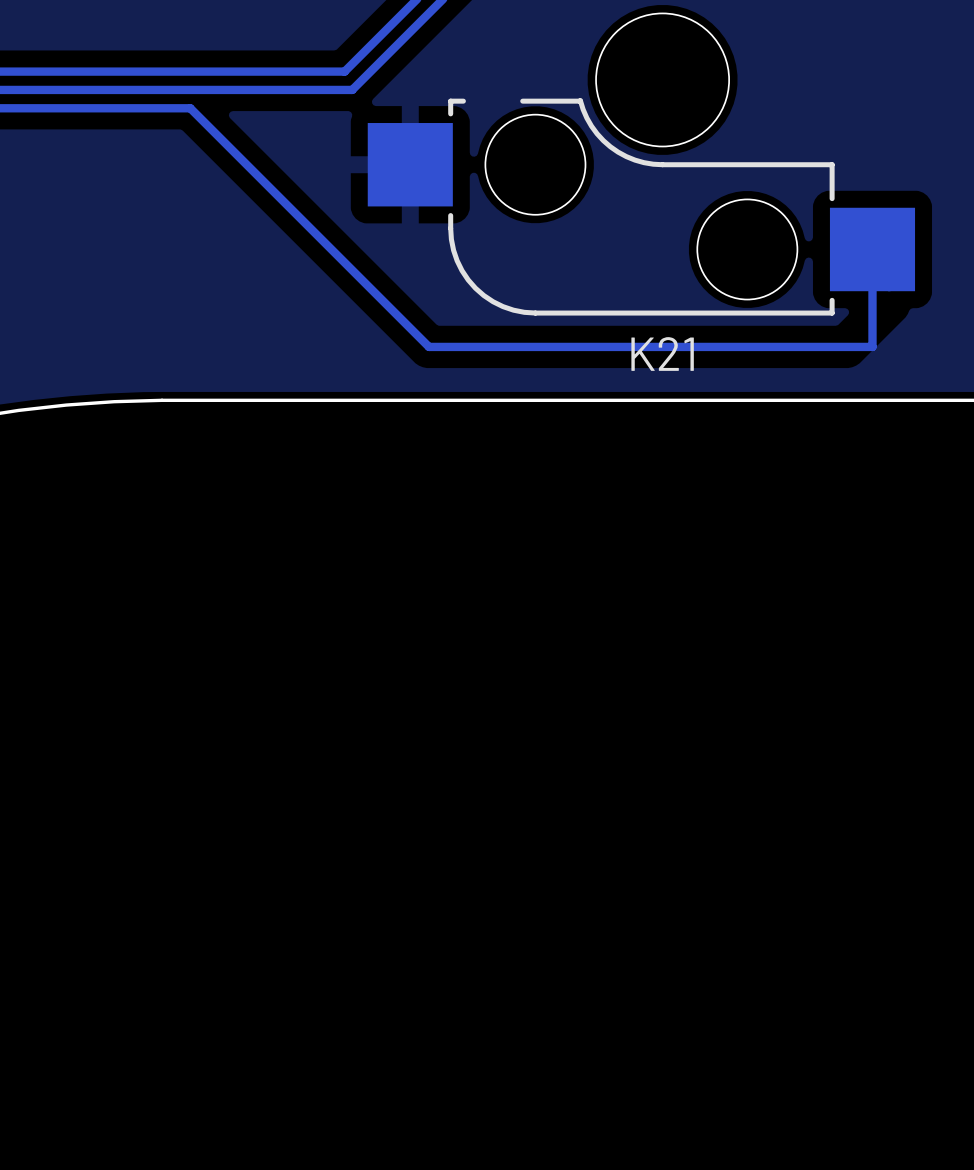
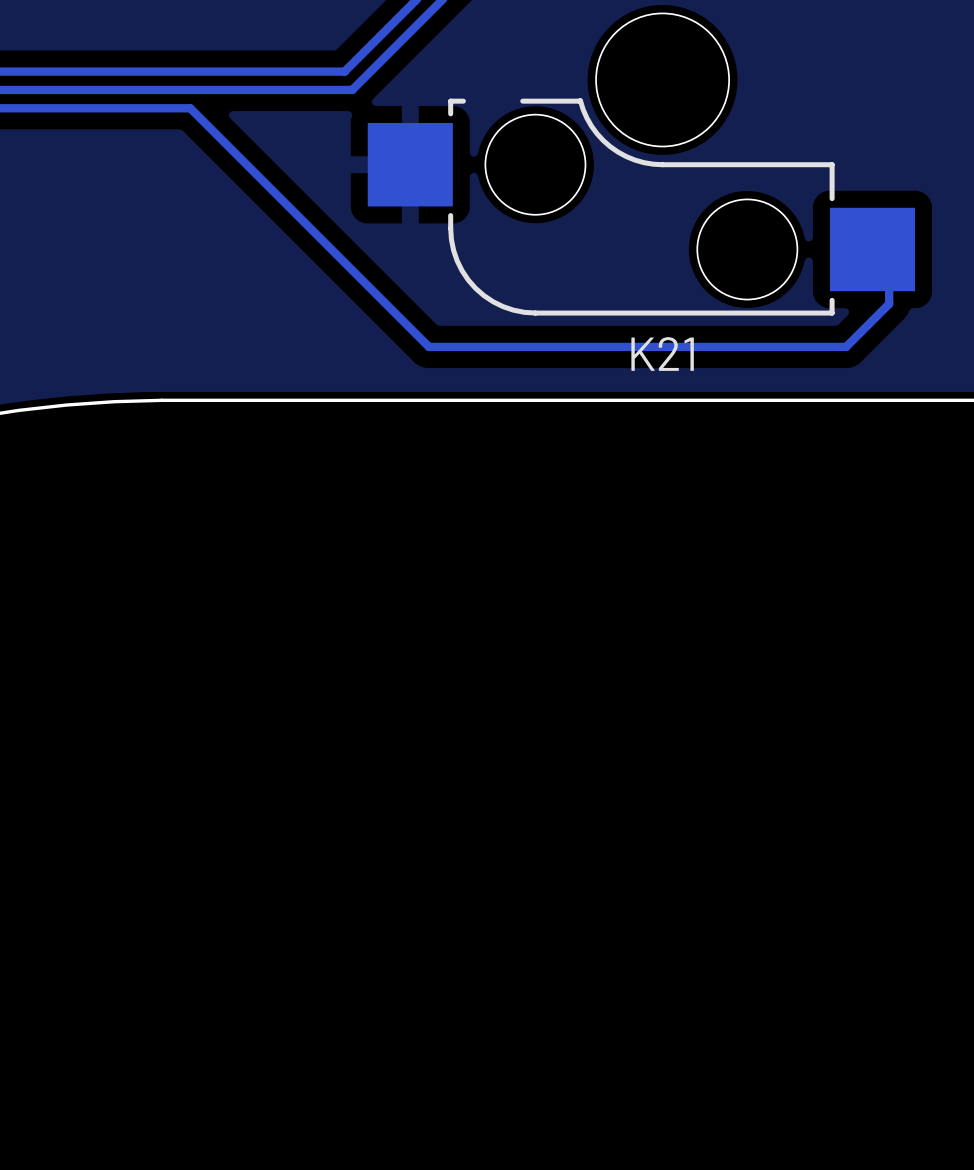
track: (872, 249) (872, 346) (846, 346) -> (889, 287) (889, 303) (846, 346)

